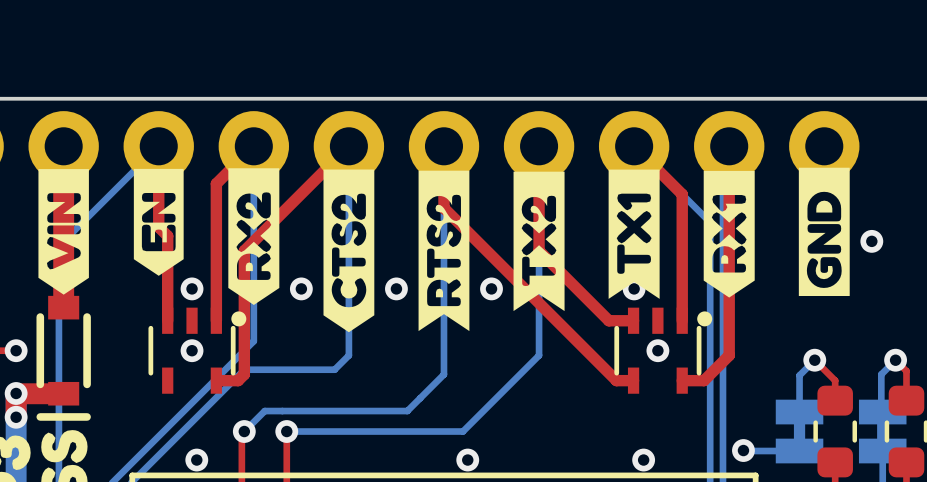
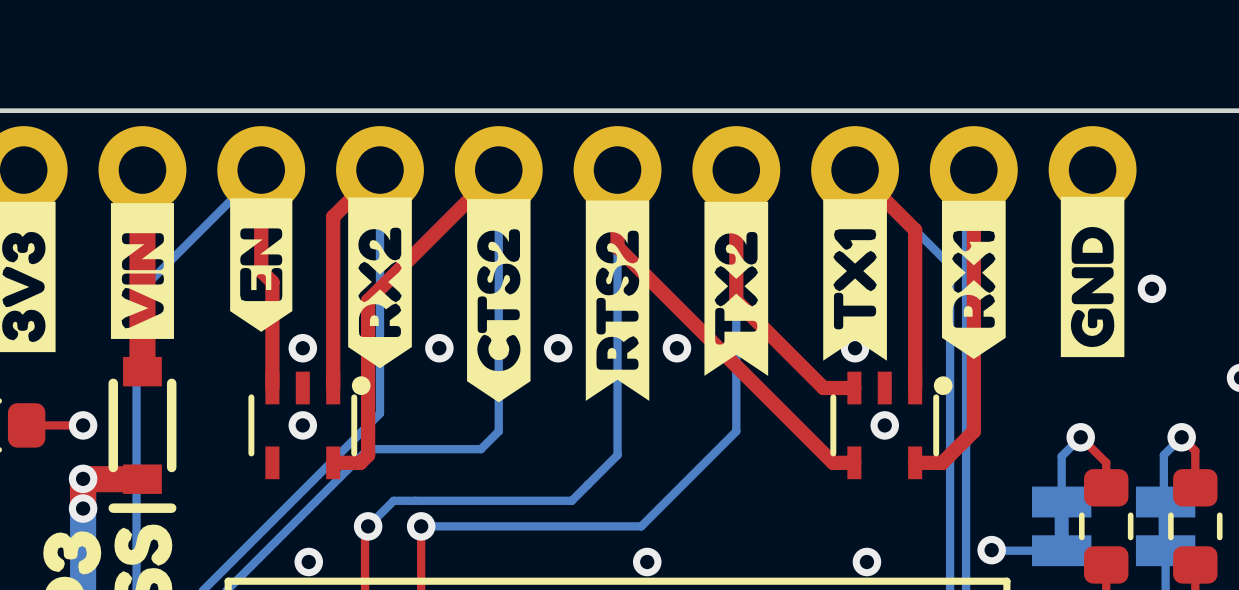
drawing shape: [38, 169, 89, 295] -> [110, 203, 174, 339]

